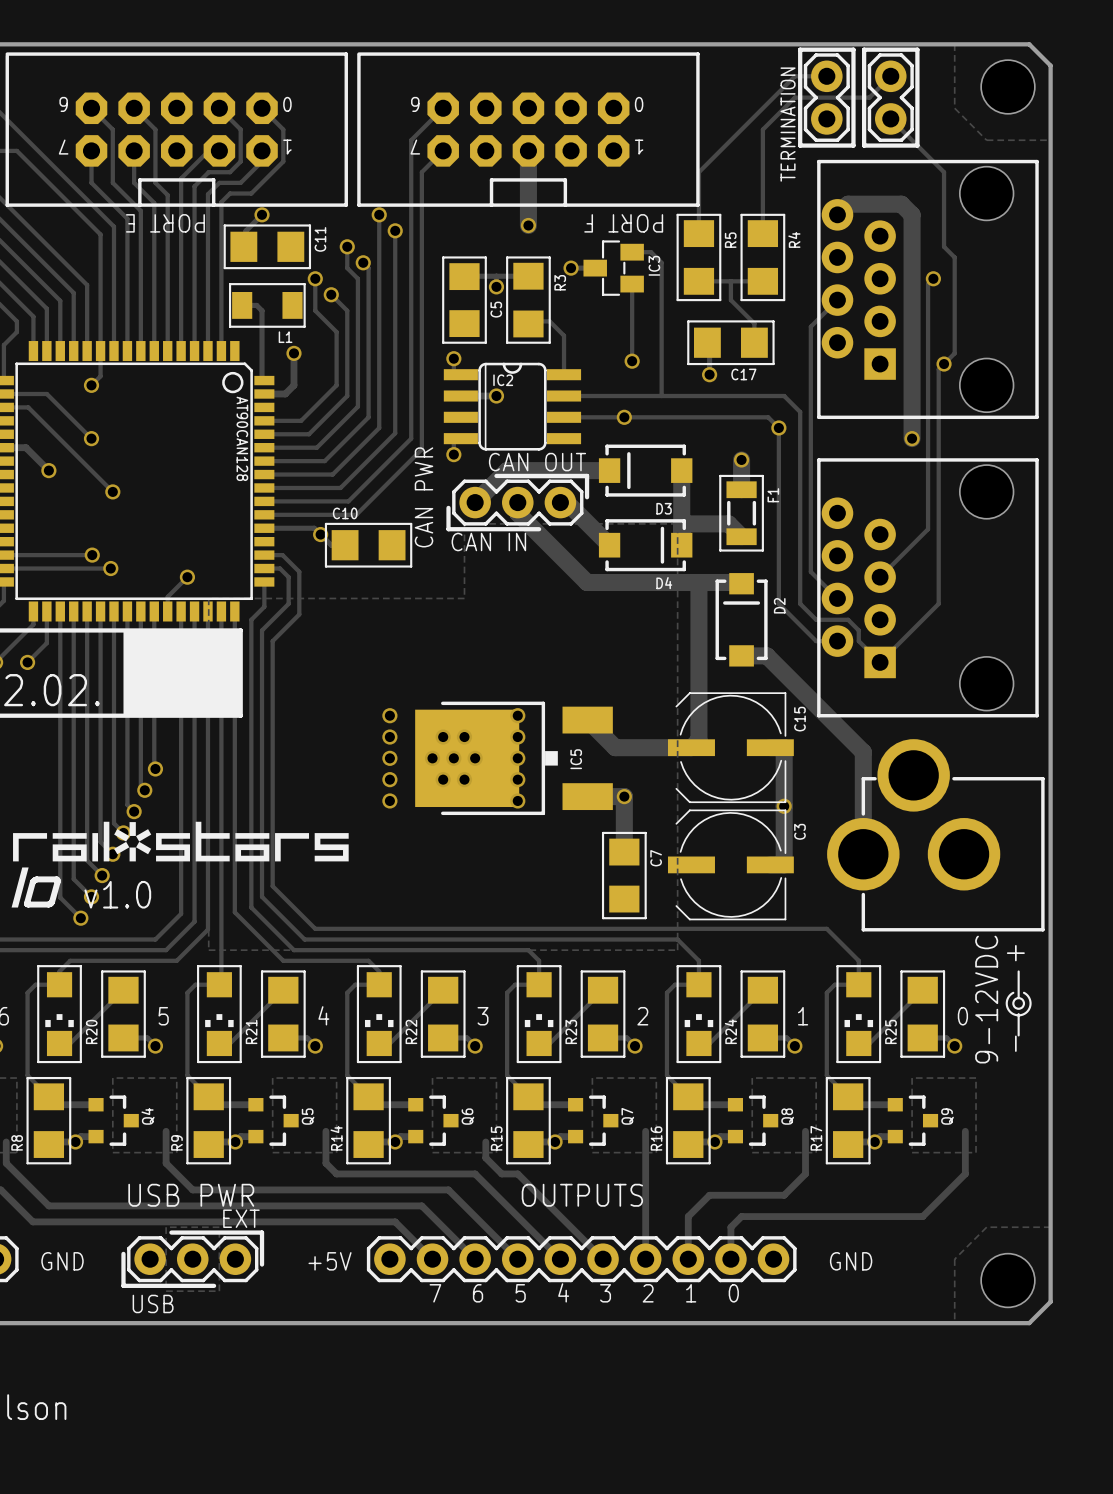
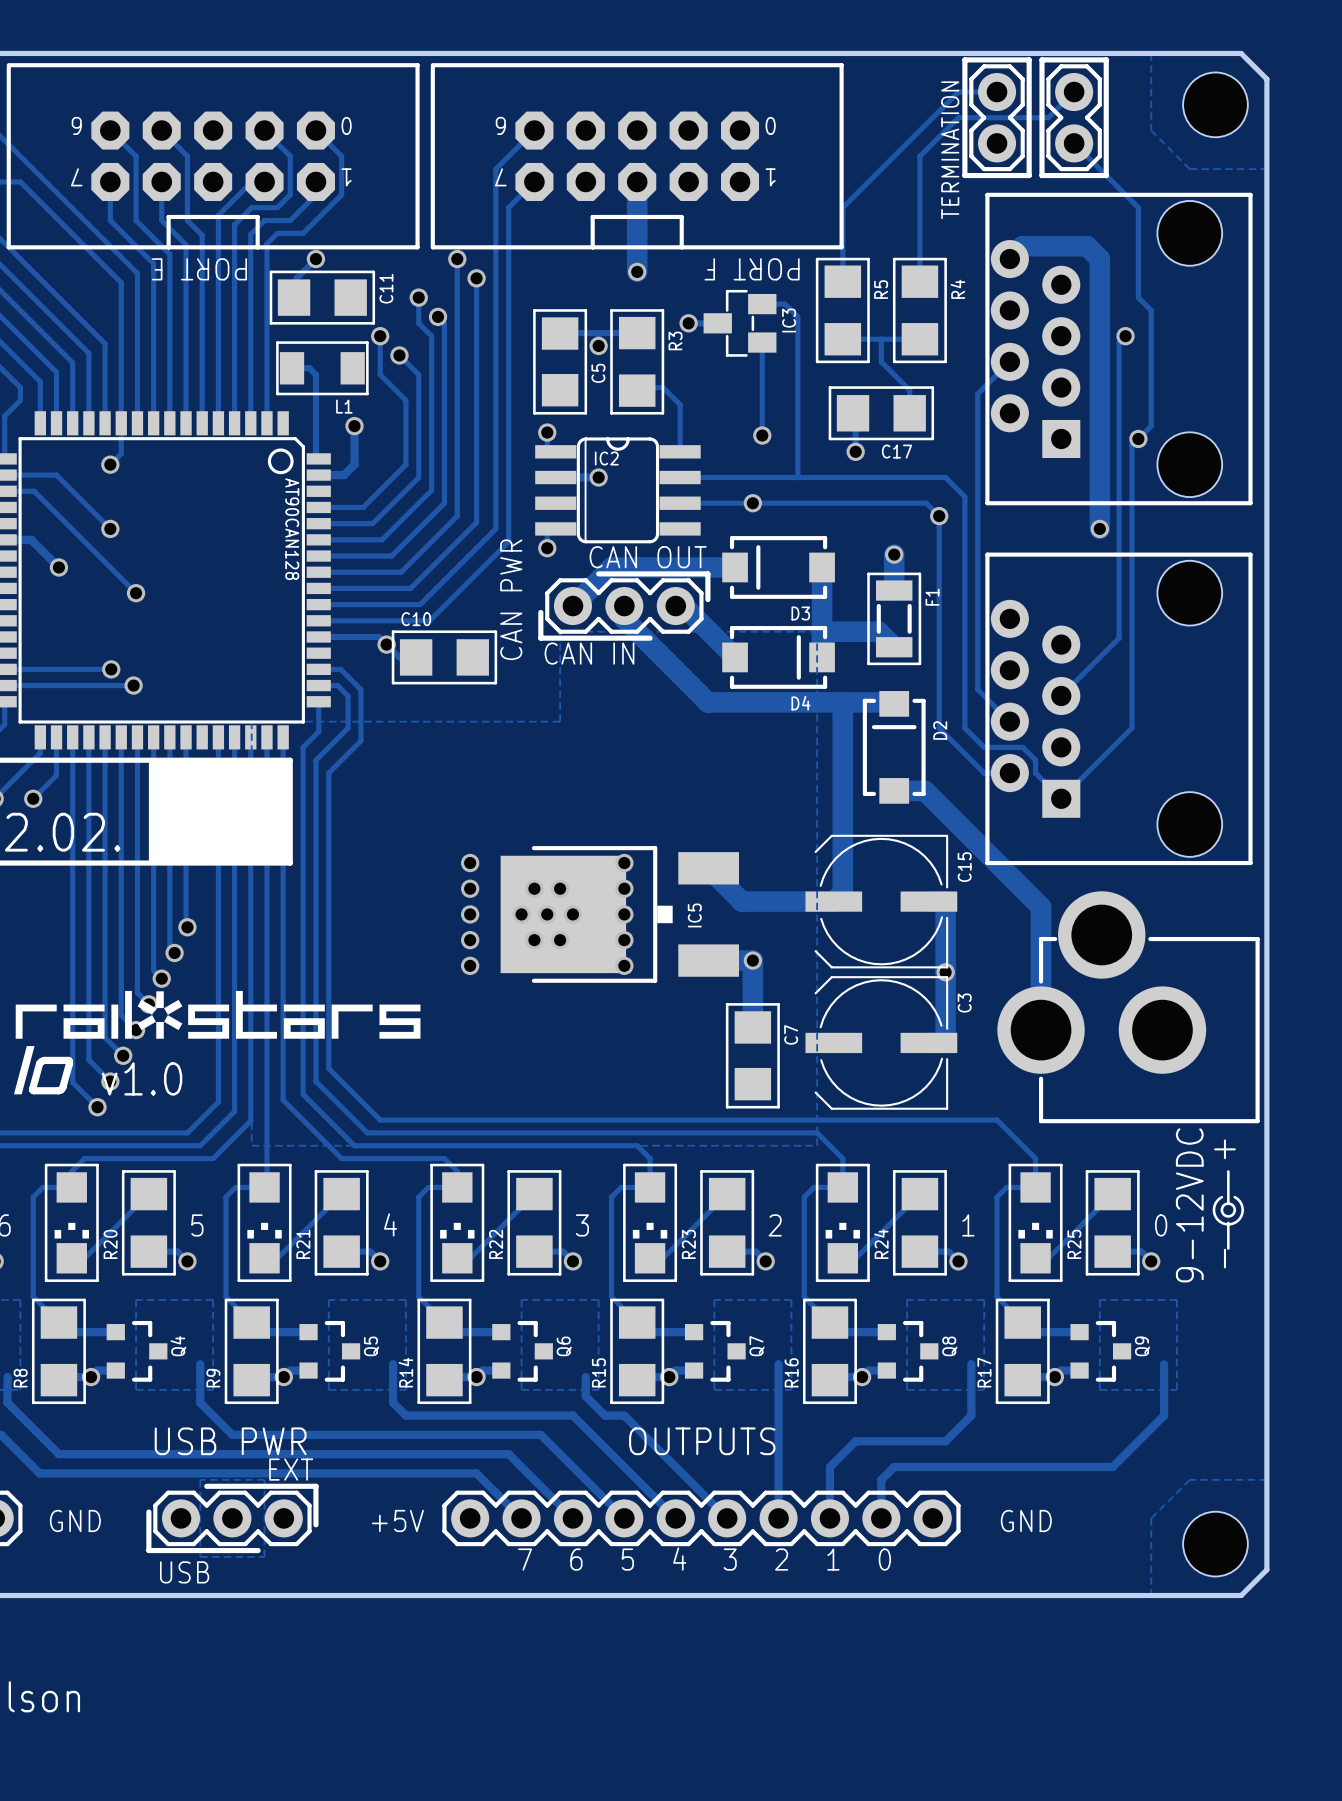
track: (187, 577) (167, 596) (167, 611) -> none
via: (187, 577) -> none

